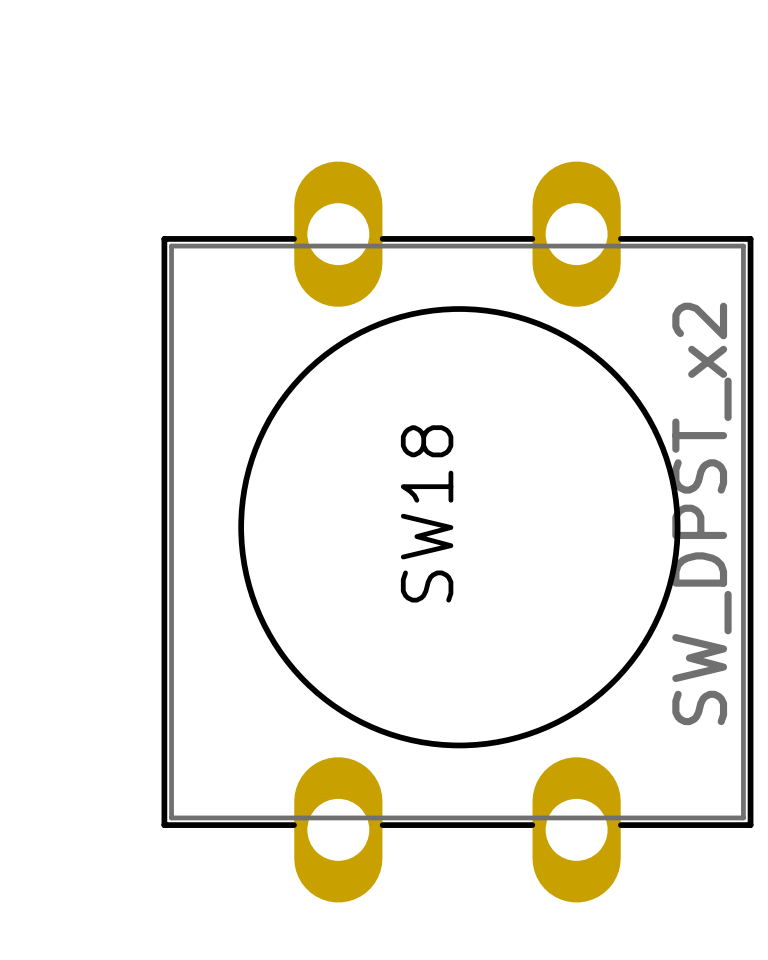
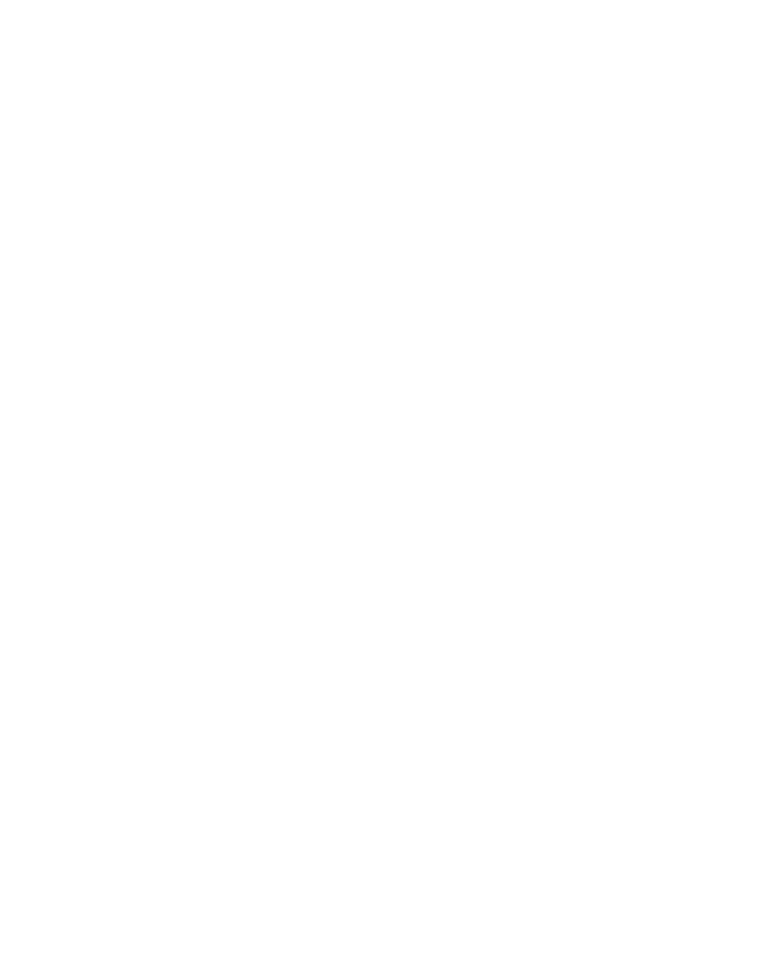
SW18: SW_DPST_x2 (457, 532) -> none

